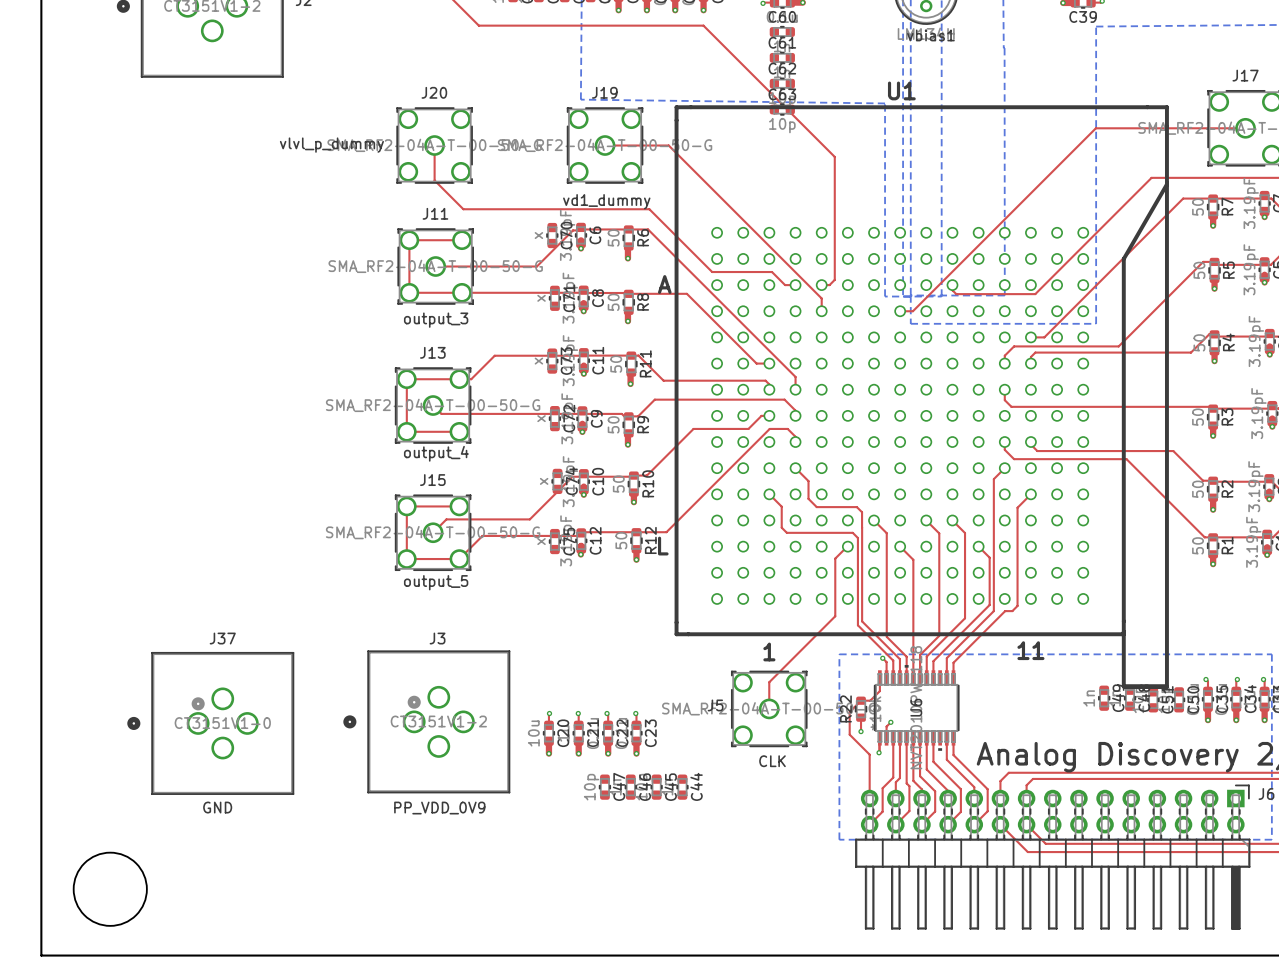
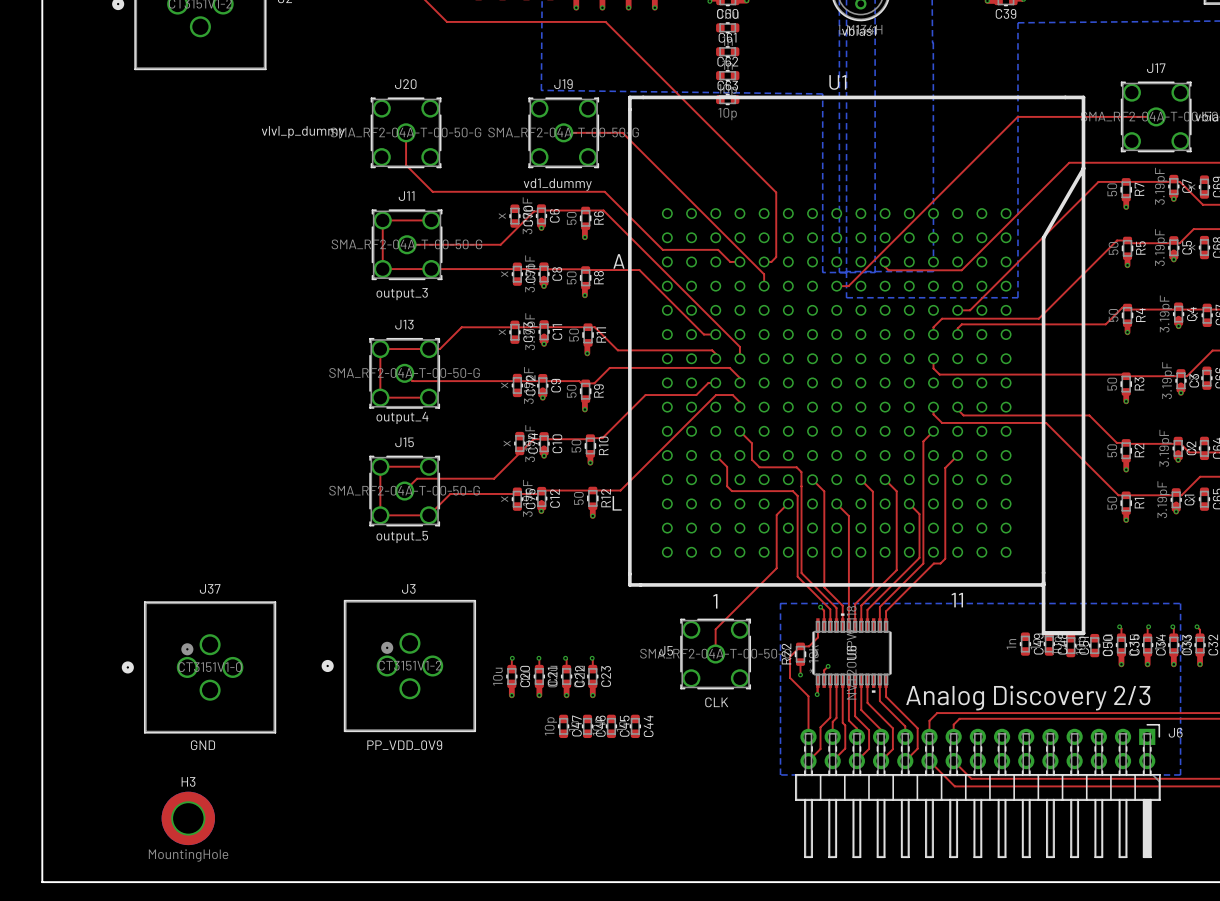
top track: (650, 25) (703, 25) (834, 156) (834, 210) -> (605, 21) (776, 192)
round board edge: [73, 852, 148, 927] -> none
H3: none -> MountingHole (188, 818)

